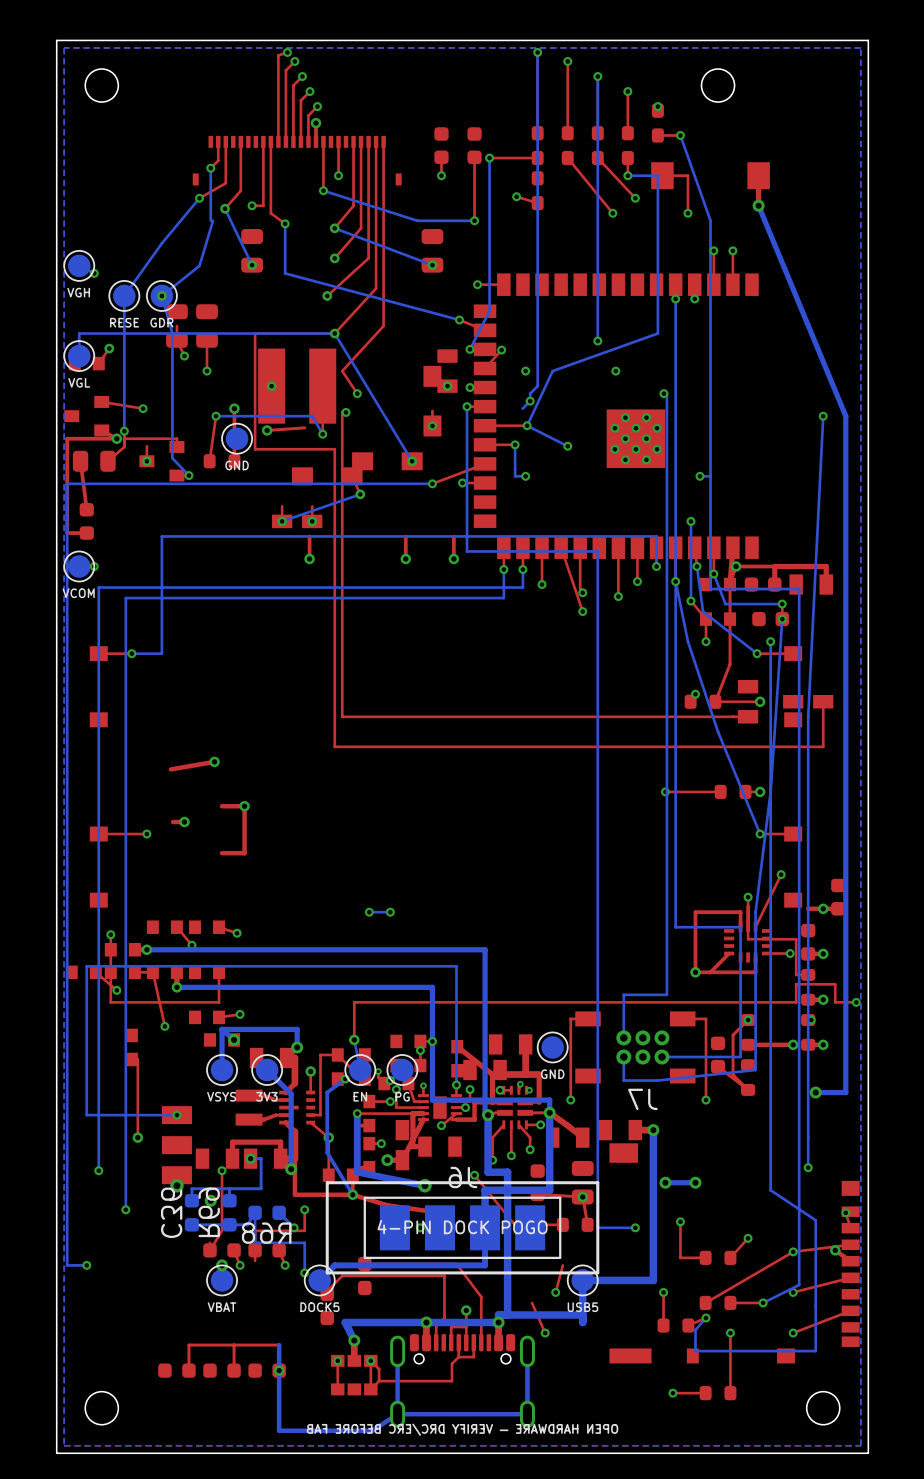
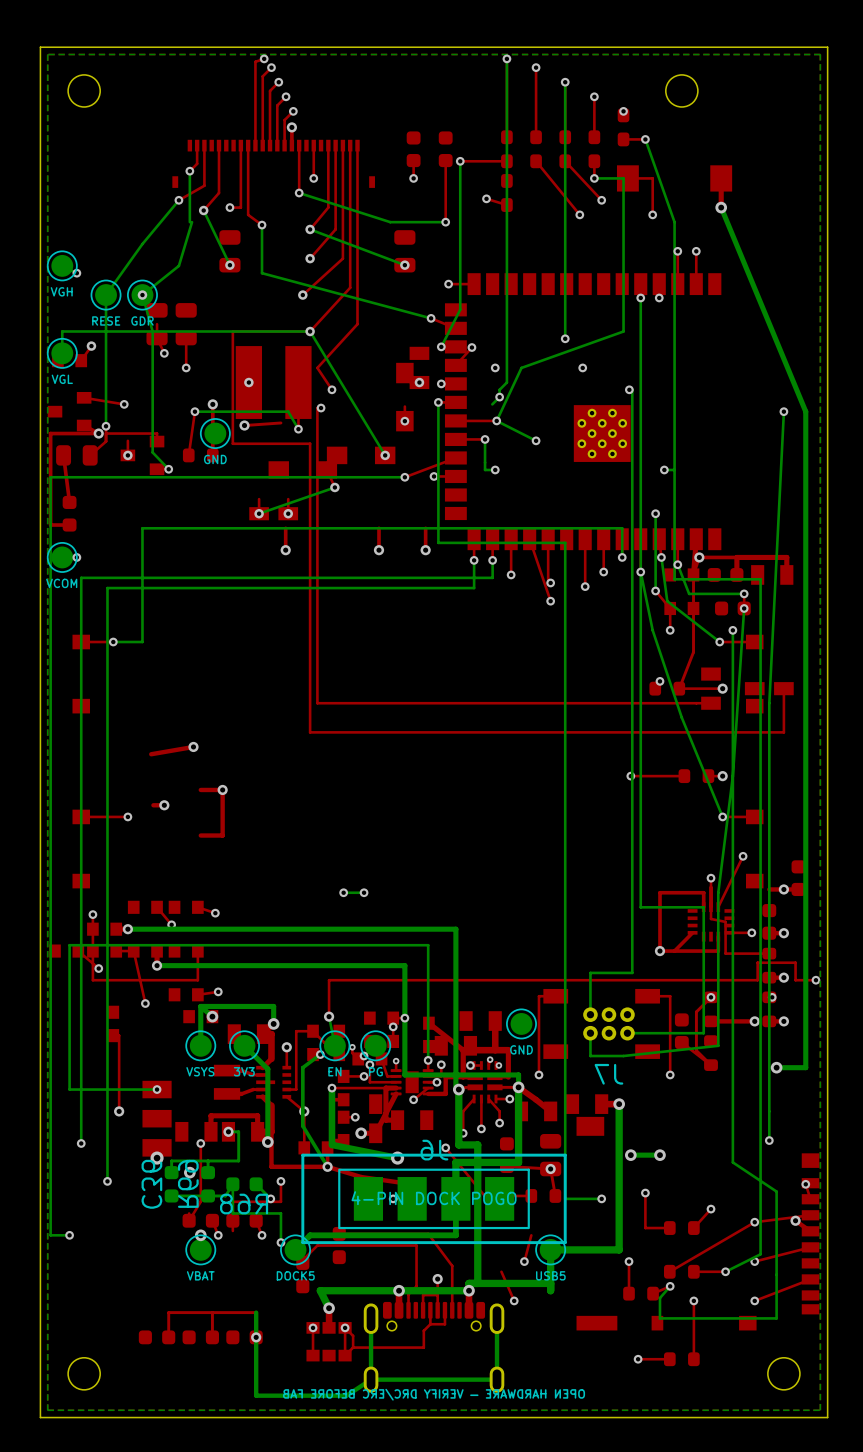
top track: (748, 939) (796, 939) (796, 974) -> (711, 918) (725, 921) (725, 953) (757, 953)

